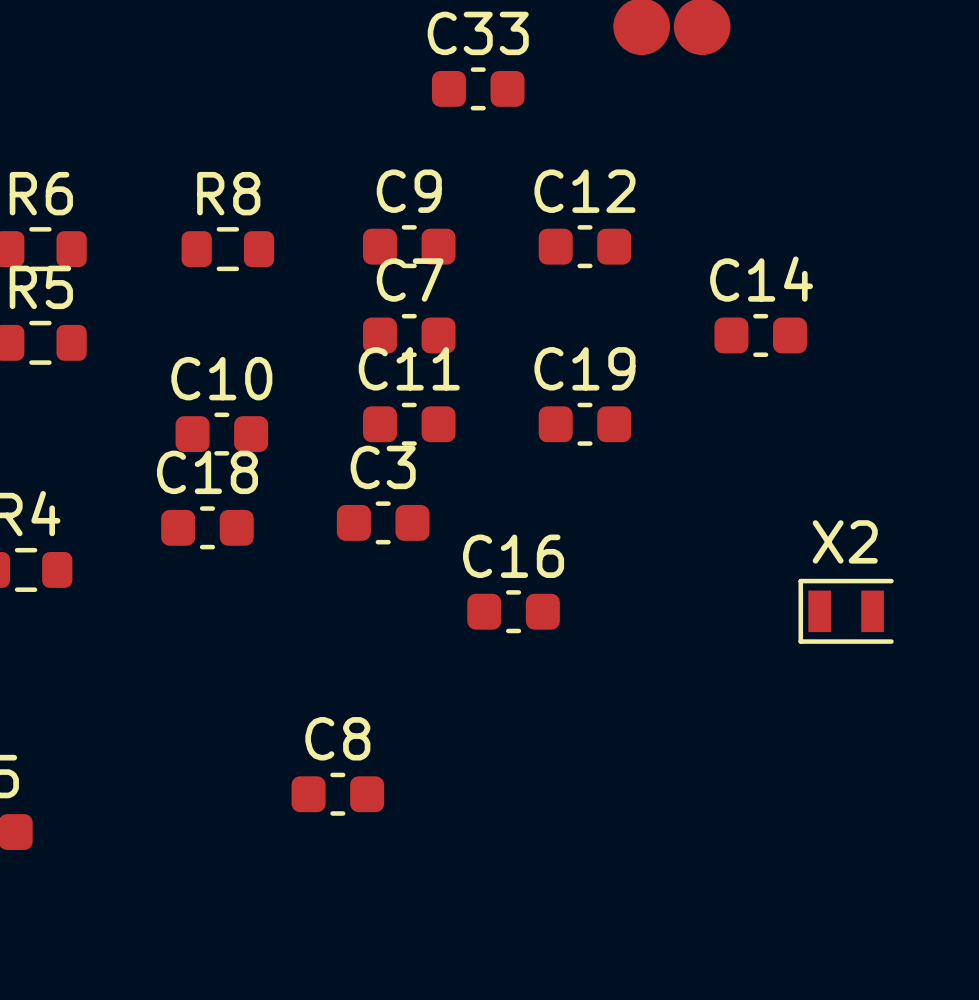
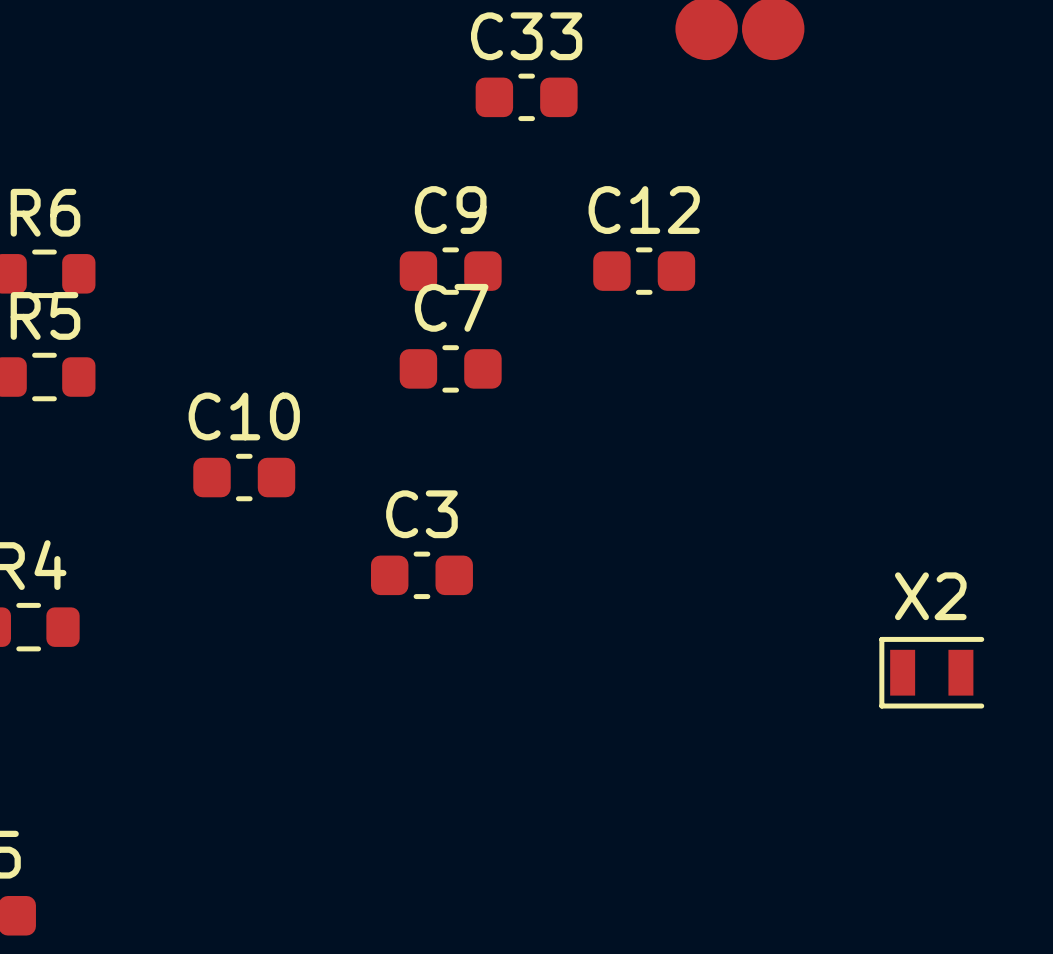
R8: (227, 249) -> none
C14: (760, 335) -> none
C11: (409, 424) -> none
C19: (584, 424) -> none
C18: (207, 527) -> none
C16: (513, 611) -> none
C8: (337, 794) -> none

